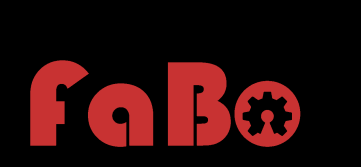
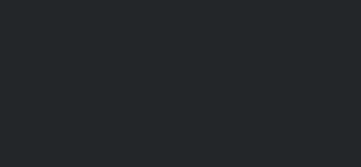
part: (165, 103) -> none

